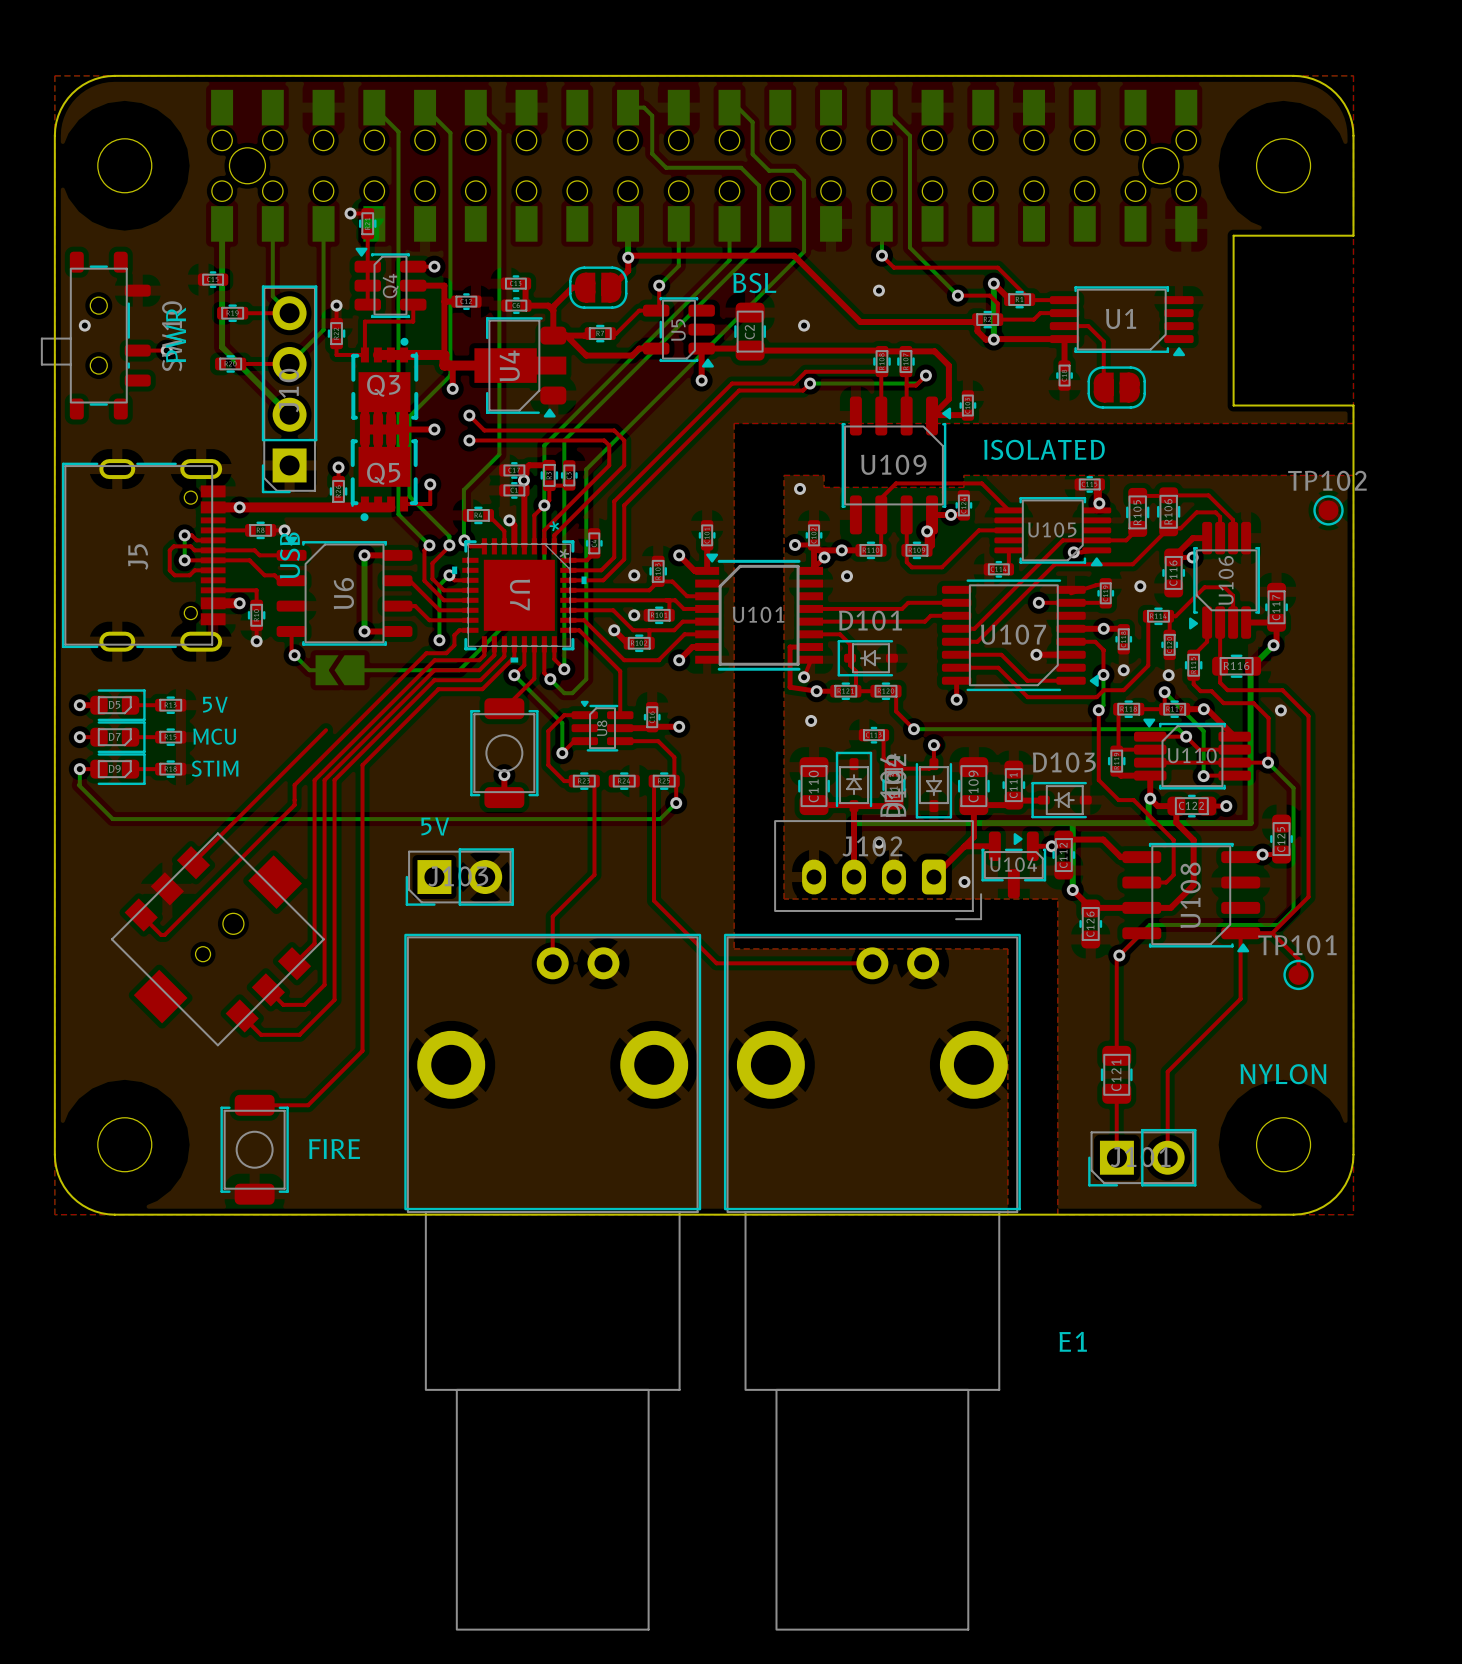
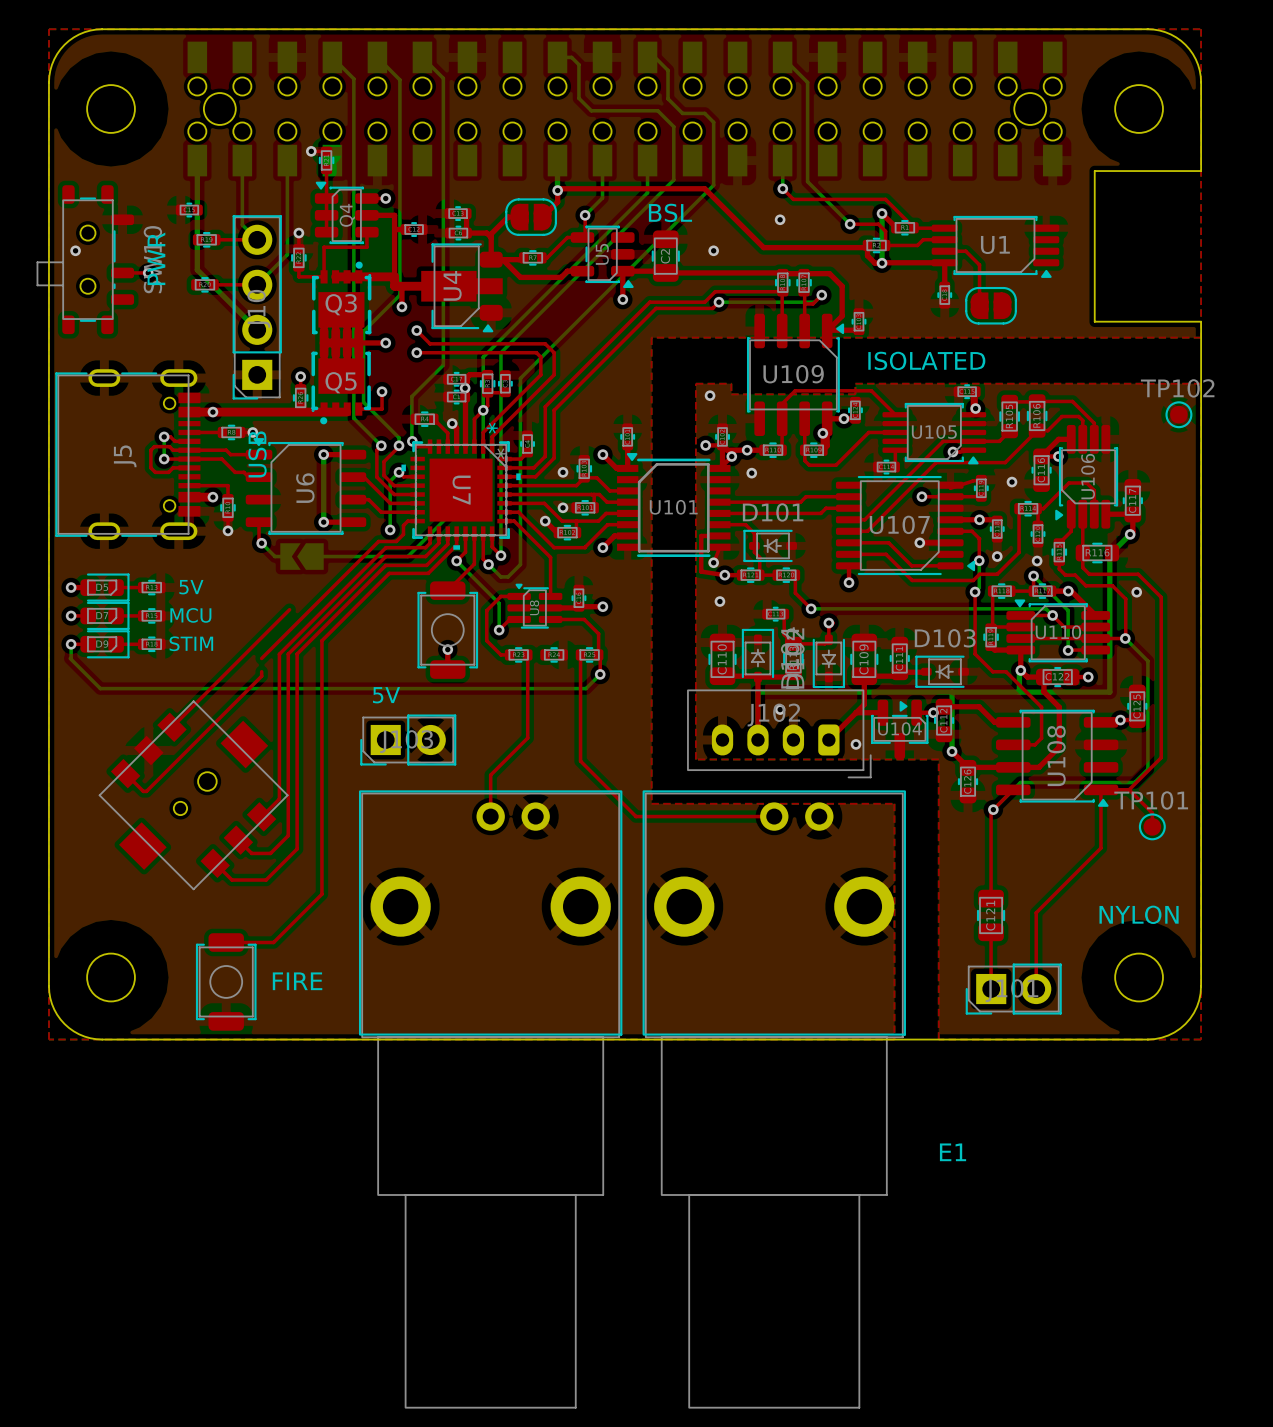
top track: (294, 785) (294, 800) -> none

